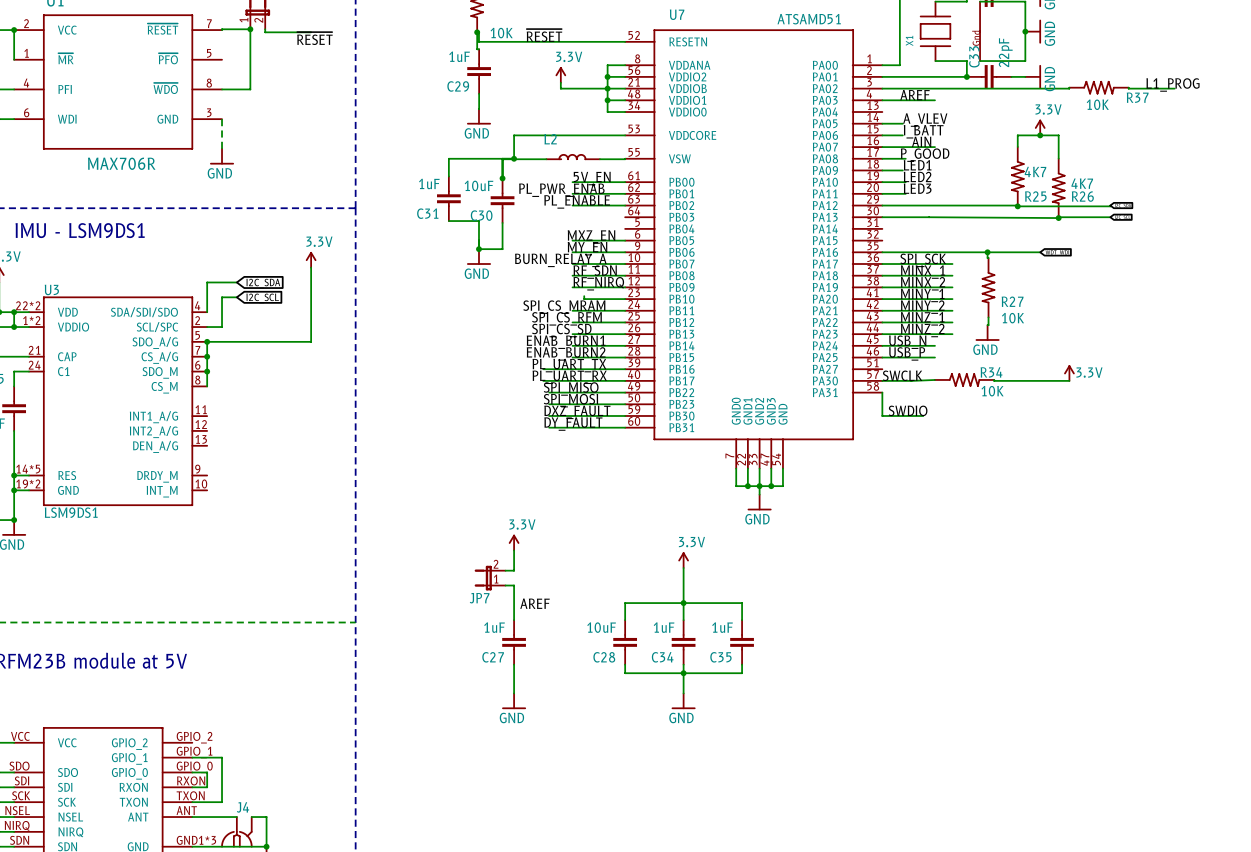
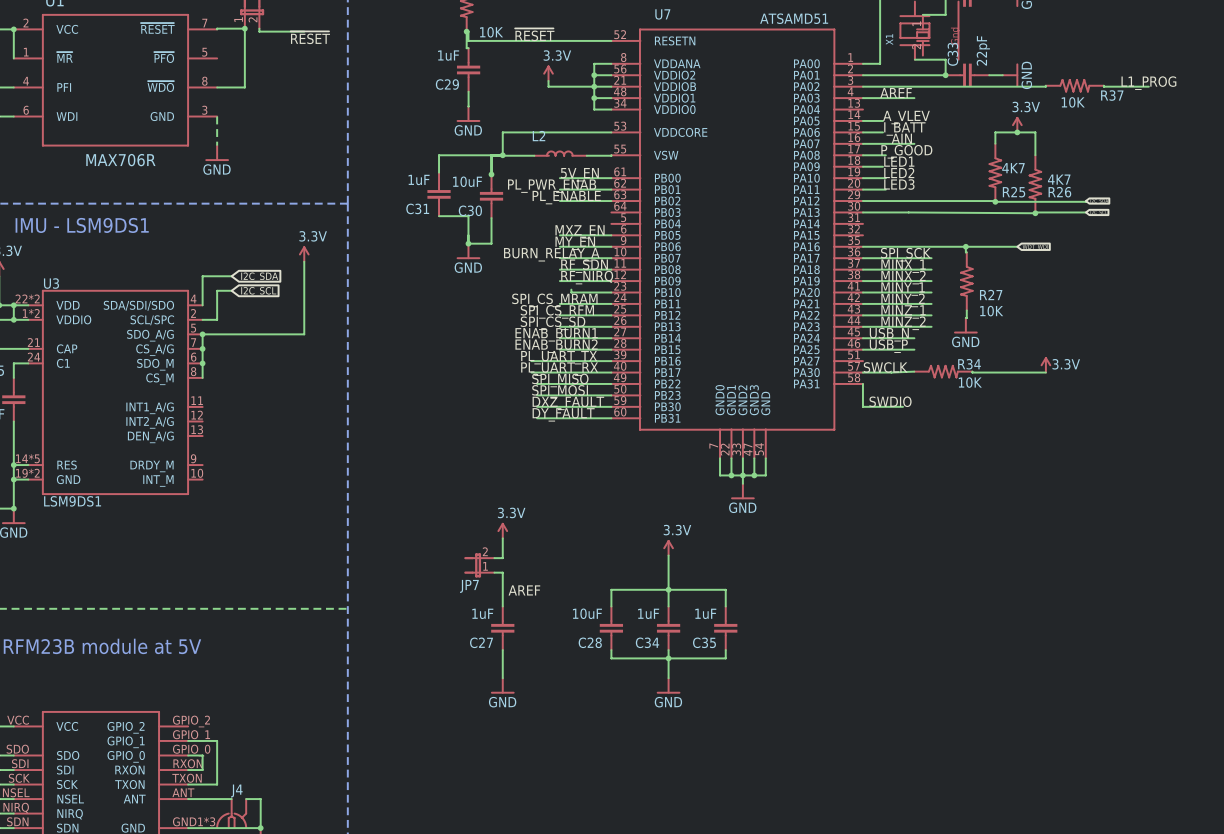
wire: (935, 1) (966, 1) -> (922, 14) (945, 14) (945, 1)
wire: (980, 1) (1025, 1) (1025, 61) (980, 61) -> none
junction: (1025, 31) -> none
power symbol: GND (1033, 31) -> none
part: none -> (922, 35)

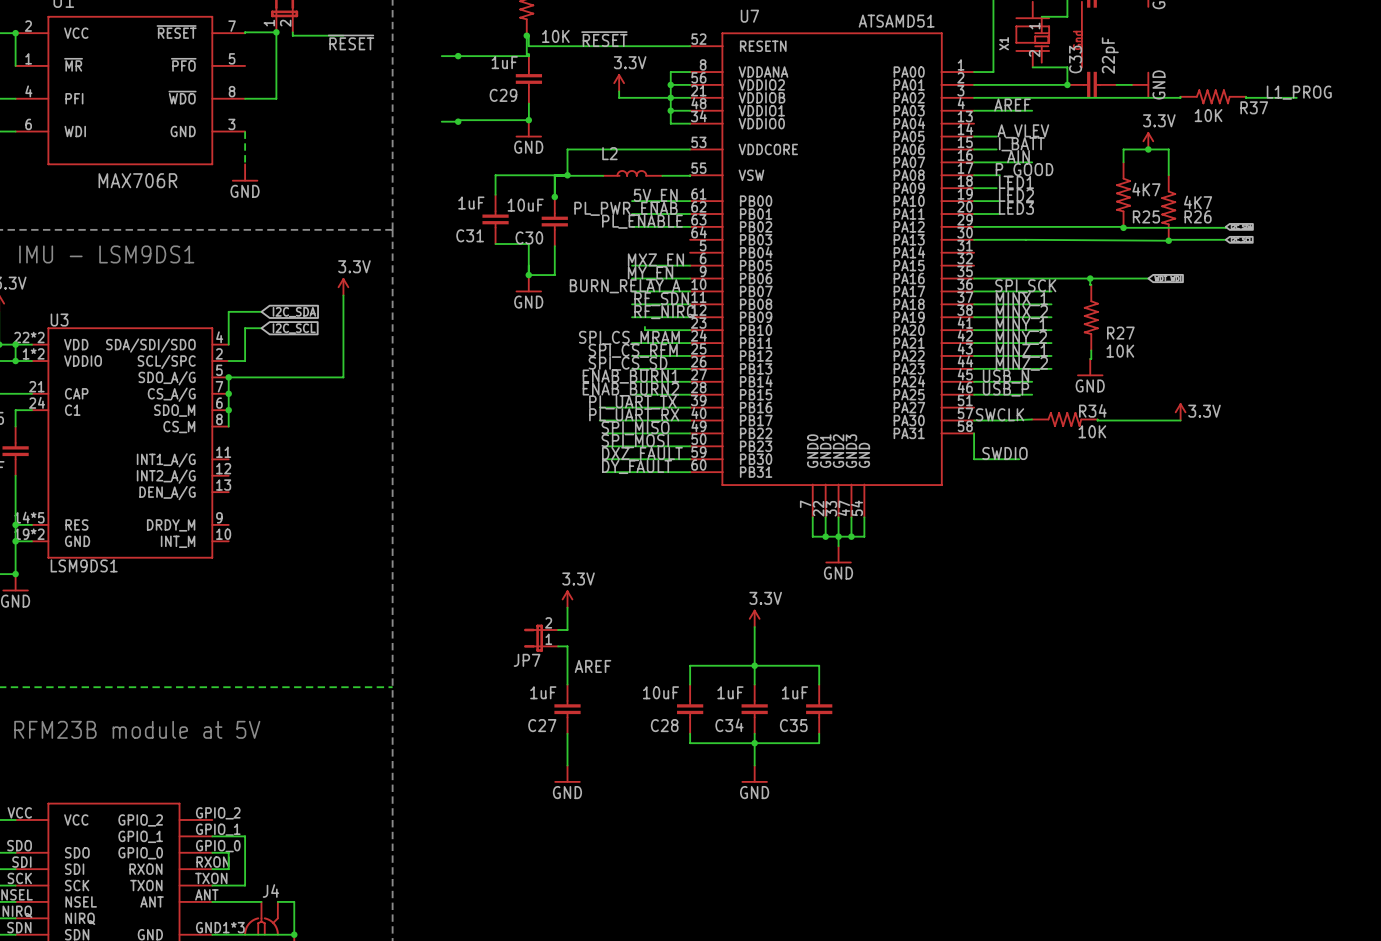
wire: none -> (528, 54) (528, 56) (441, 56)
junction: none -> (458, 56)
wire: none -> (528, 120) (441, 121)
junction: none -> (528, 120)
junction: none -> (458, 121)

